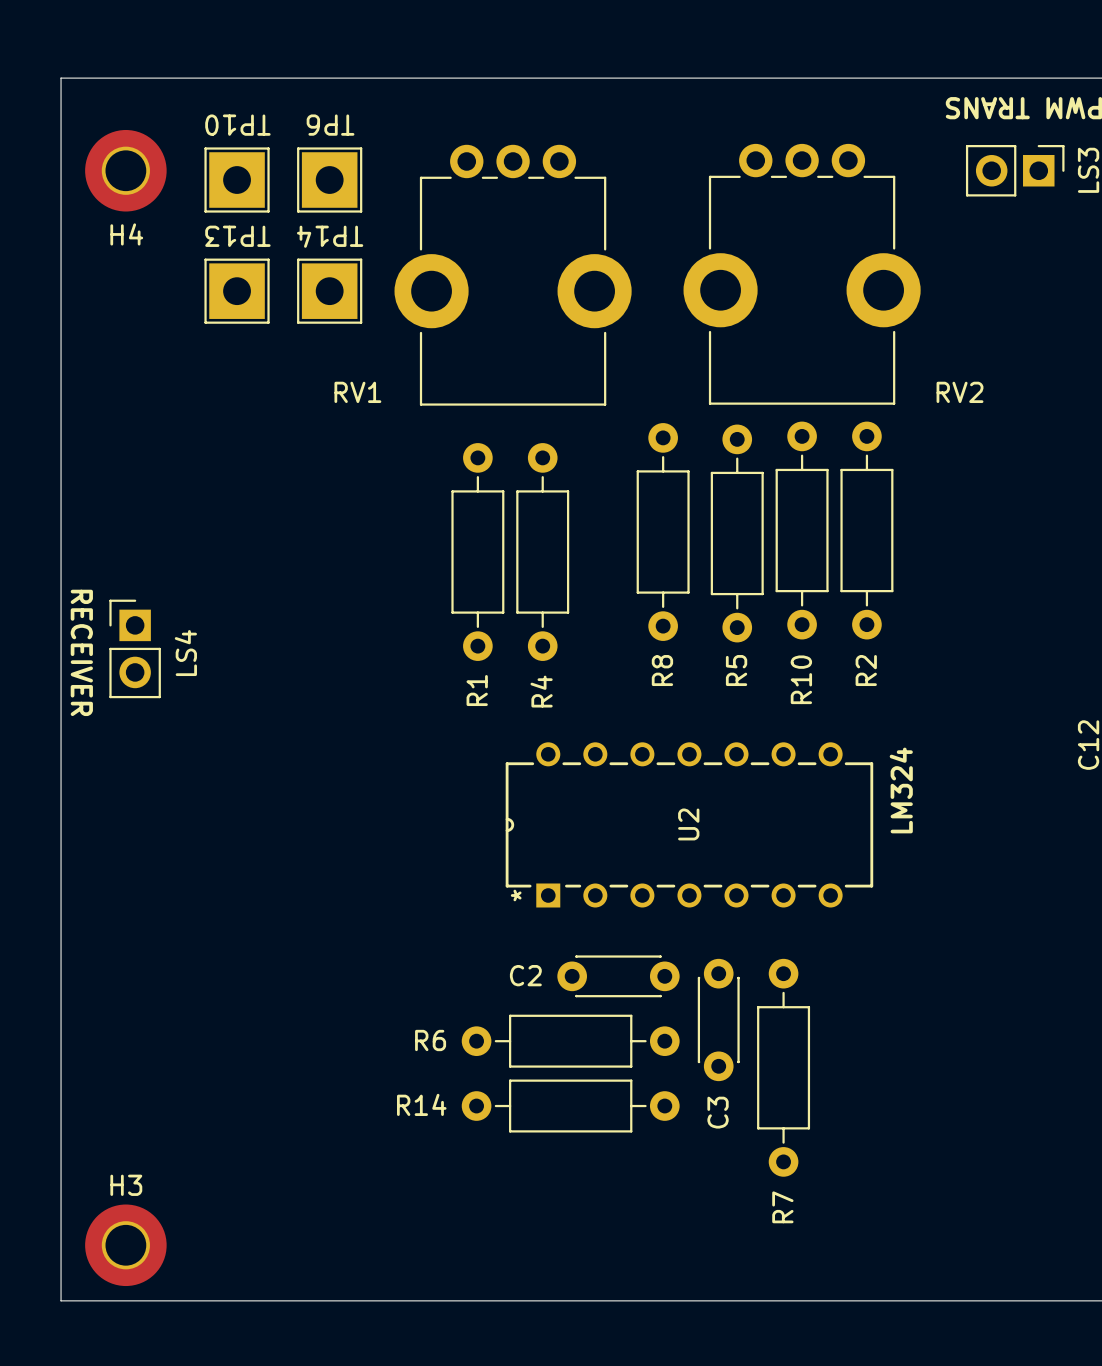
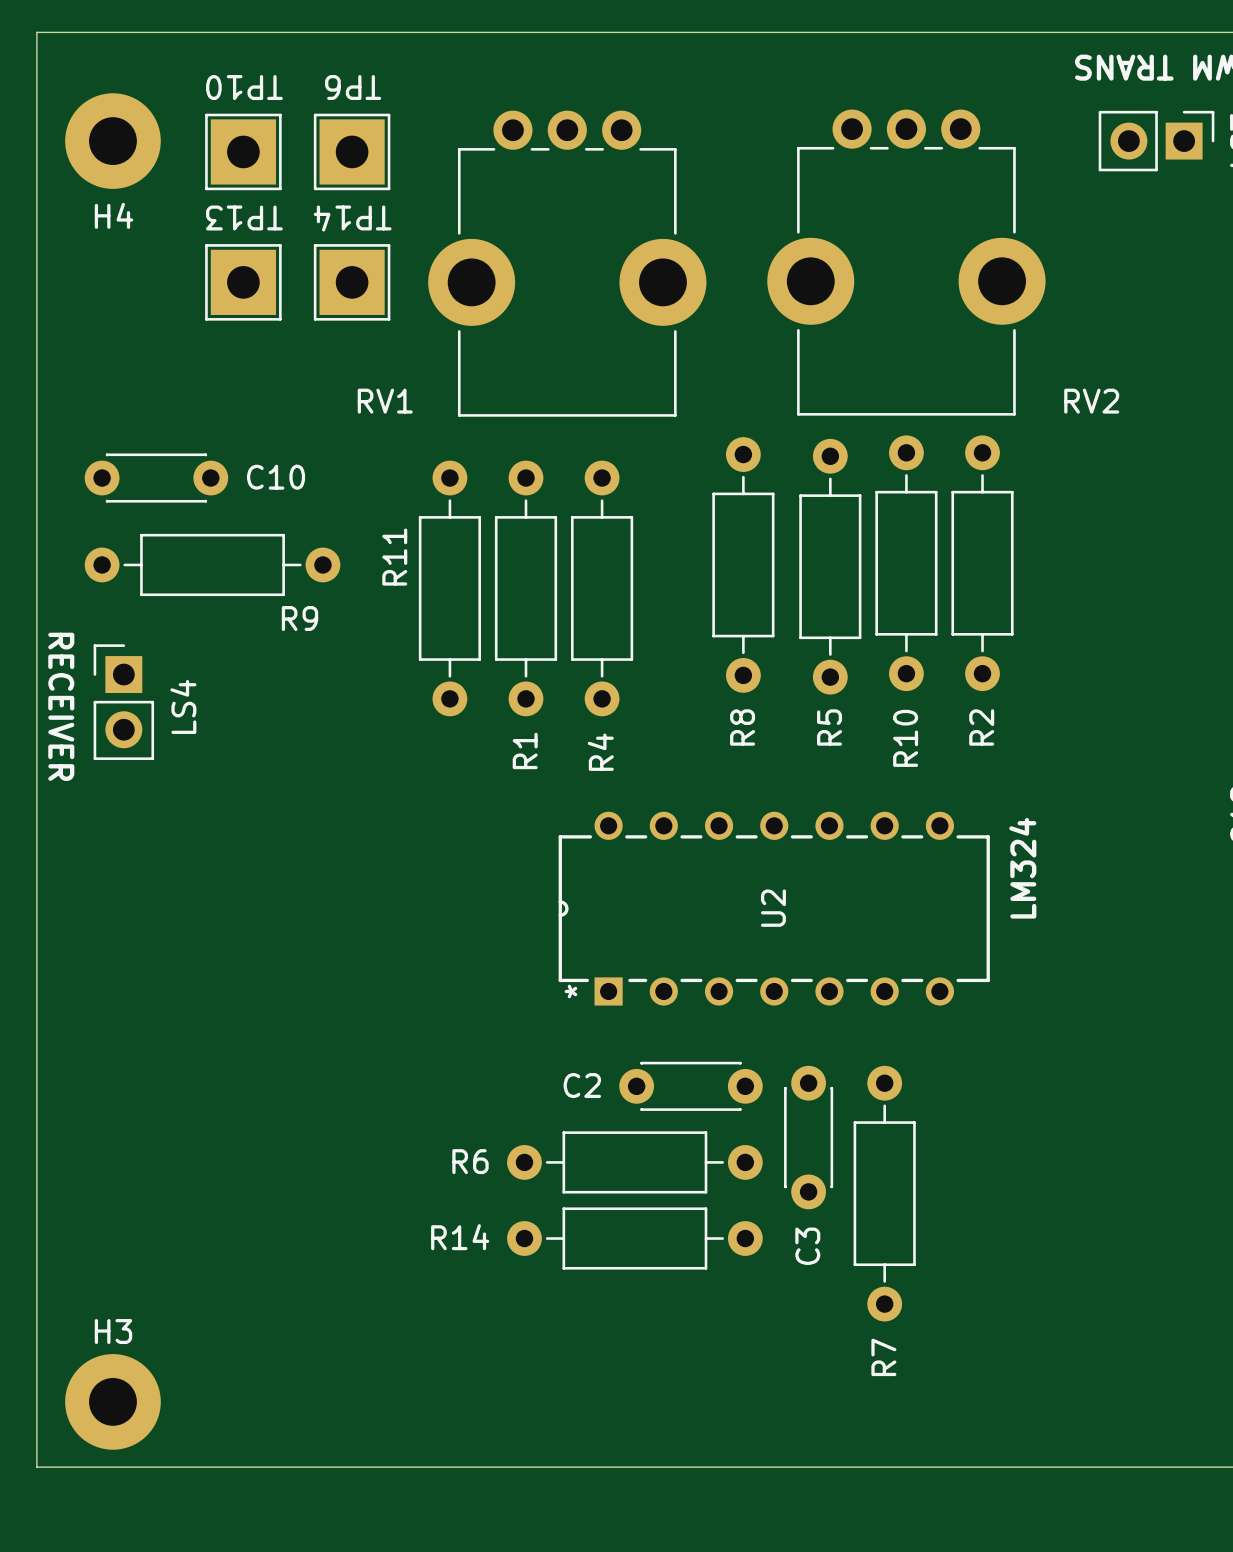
C10: none -> (156, 478)
R9: none -> (212, 564)
R11: none -> (449, 588)

